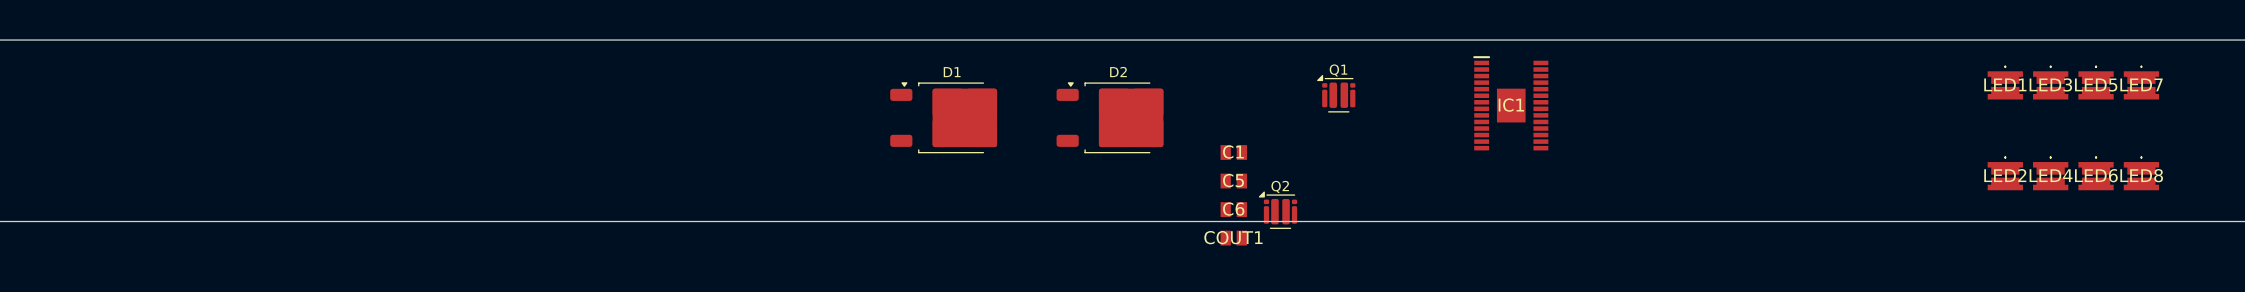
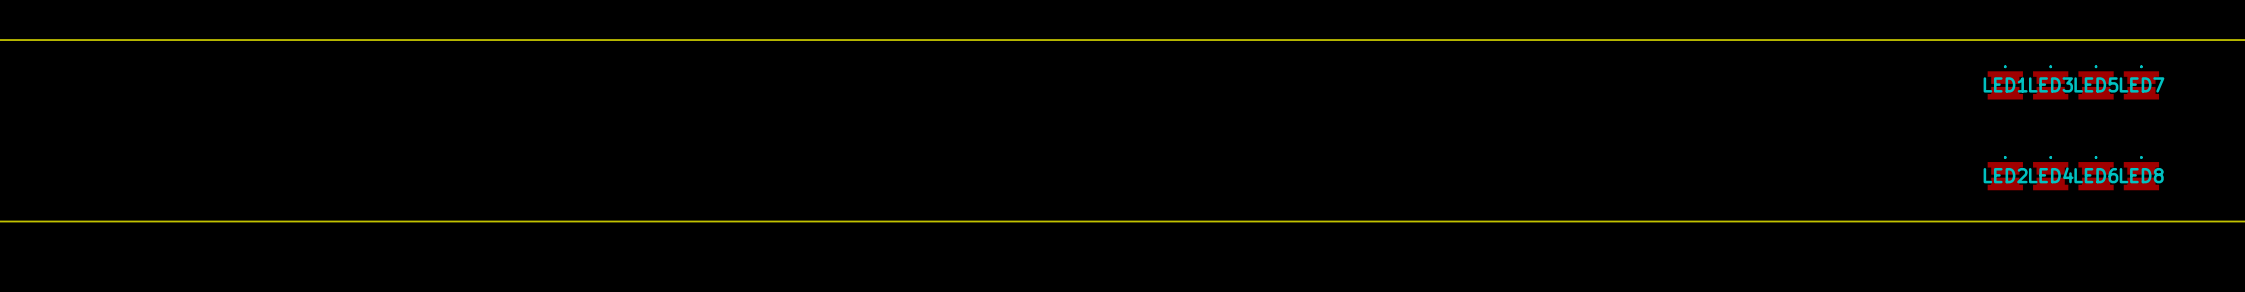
Q1: (1336, 93) -> none
IC1: (1510, 103) -> none
D1: (943, 117) -> none
D2: (1110, 117) -> none
C1: (1233, 152) -> none
C5: (1233, 181) -> none
C6: (1233, 209) -> none
Q2: (1277, 210) -> none
COUT1: (1233, 238) -> none

